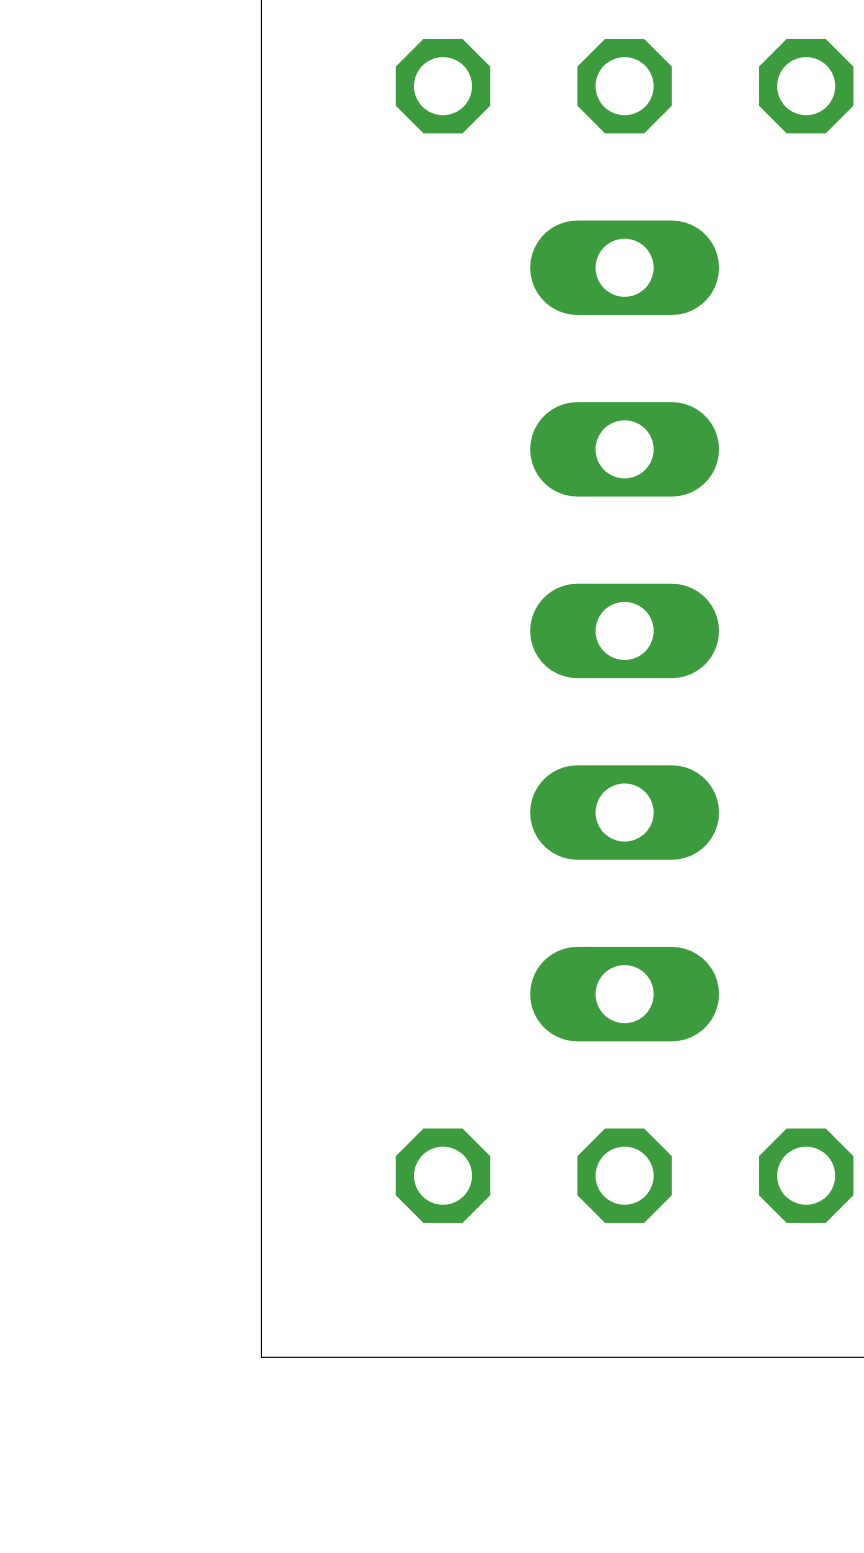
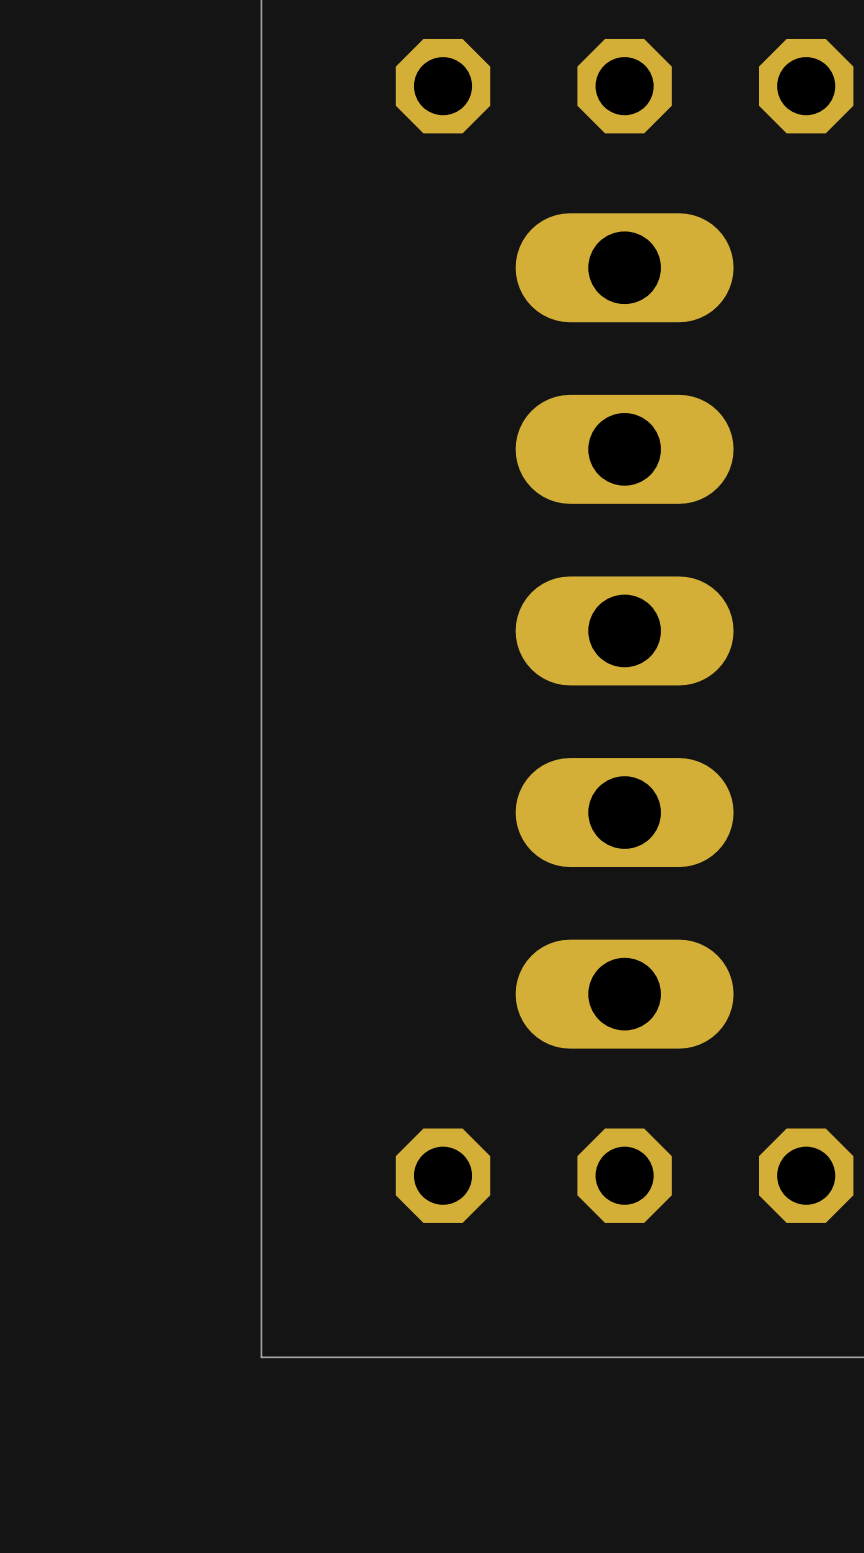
part footprint: [530, 220, 720, 1042] -> [515, 213, 734, 1049]

